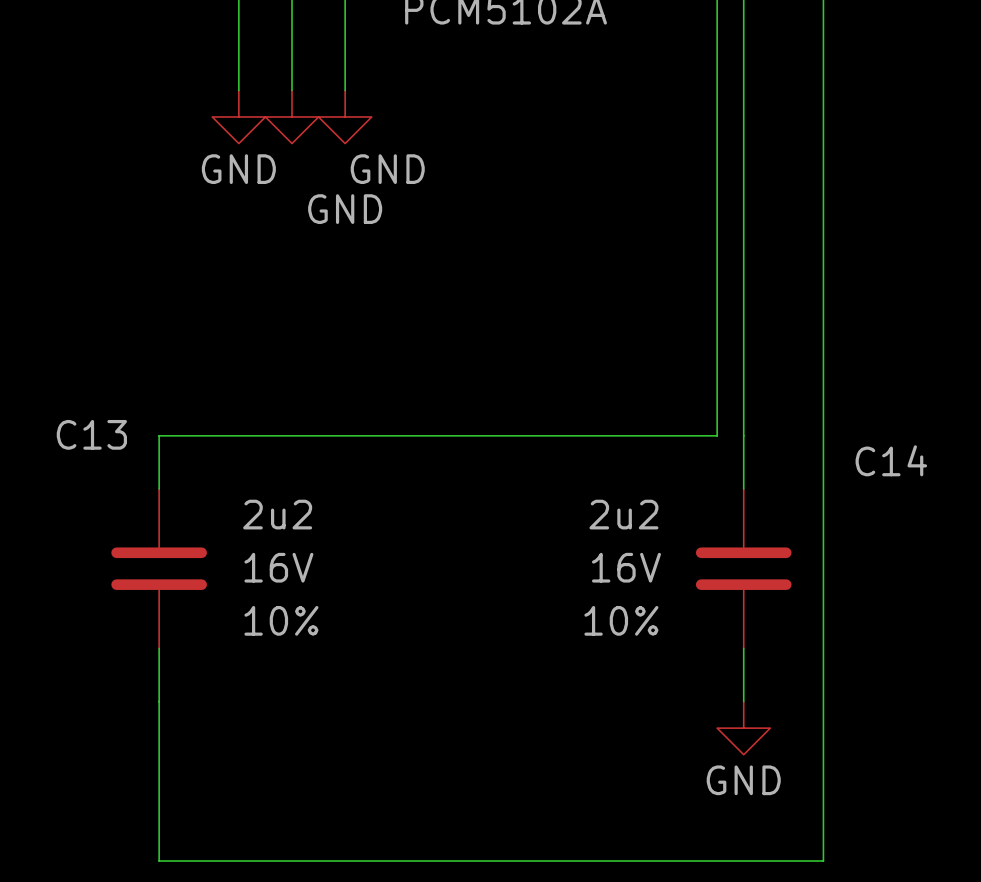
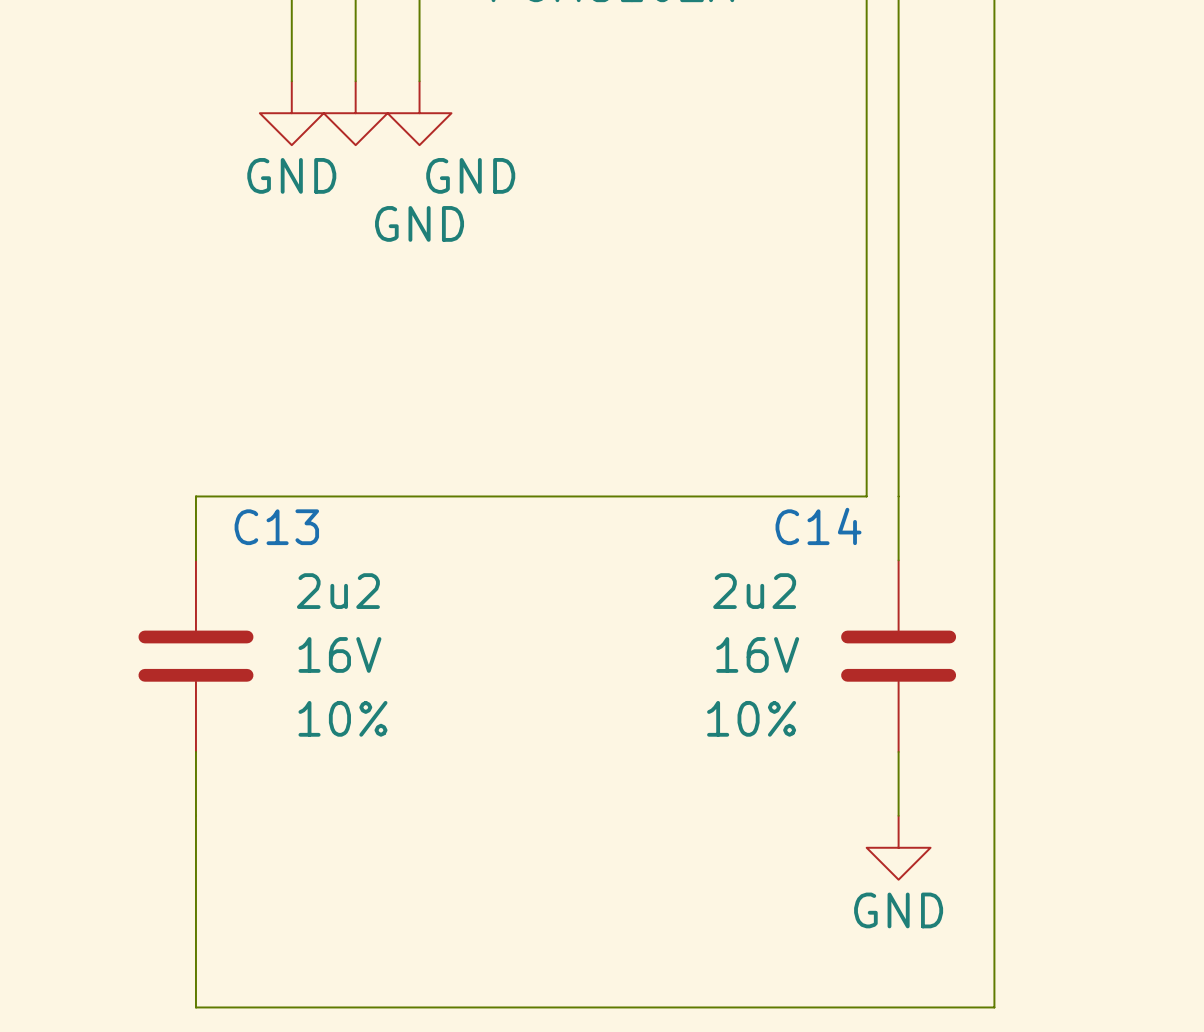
C13 name position: C13 (91, 434) -> C13 (276, 527)
C14 name position: C14 (891, 460) -> C14 (818, 526)

